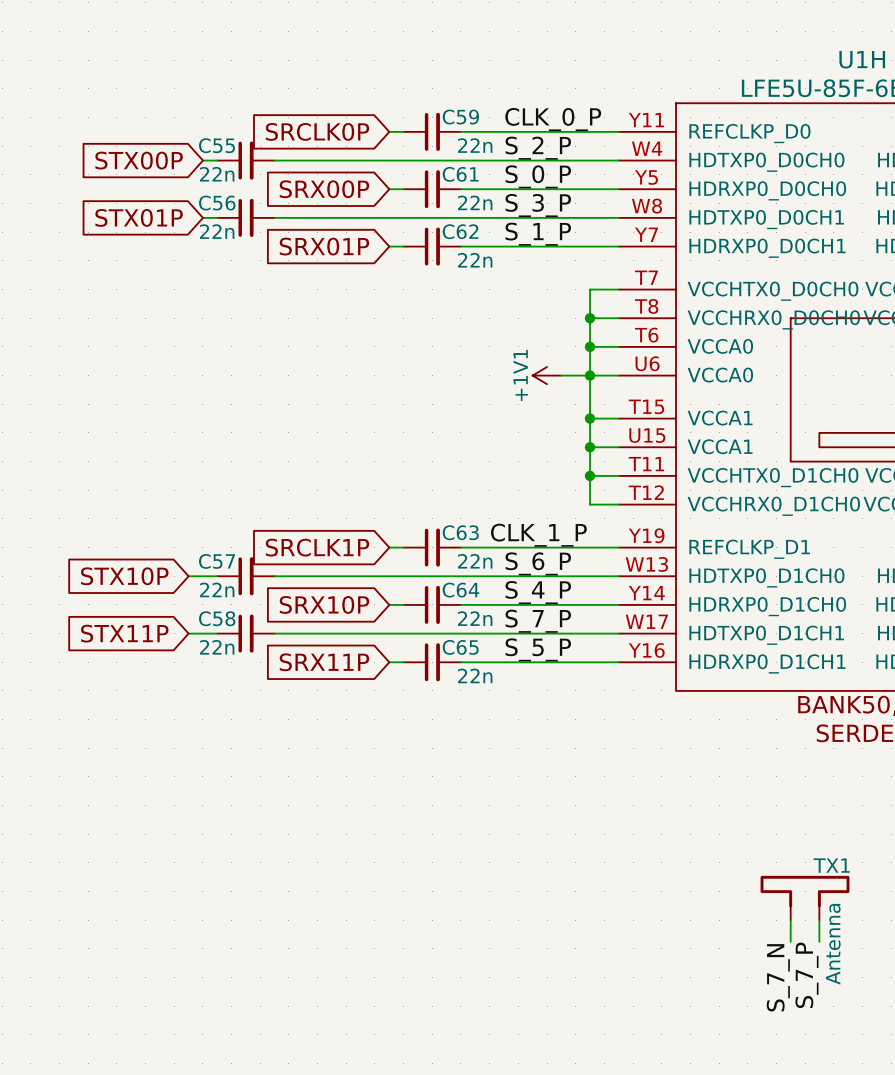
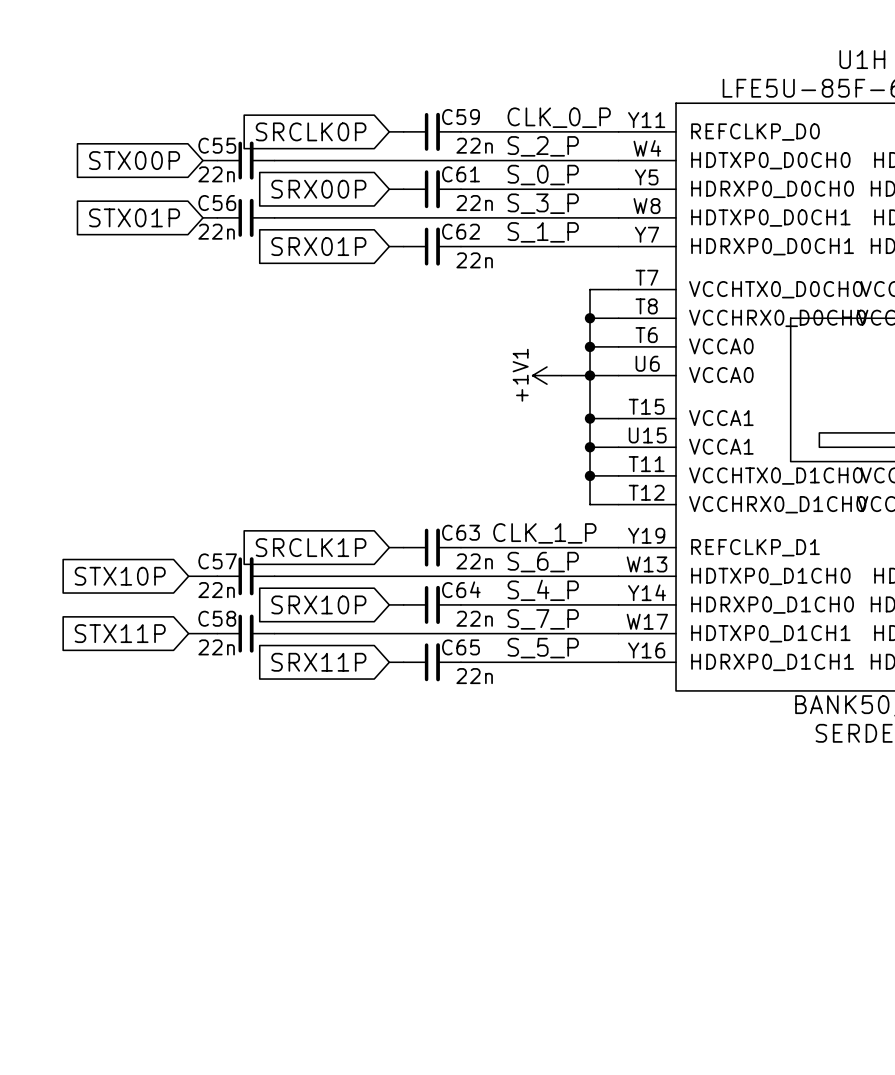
TX1: Antenna (805, 898) -> none
wire: (790, 920) (790, 941) -> none
wire: (819, 920) (819, 941) -> none
label: S_7_P (806, 975) -> none
label: S_7_N (778, 977) -> none

